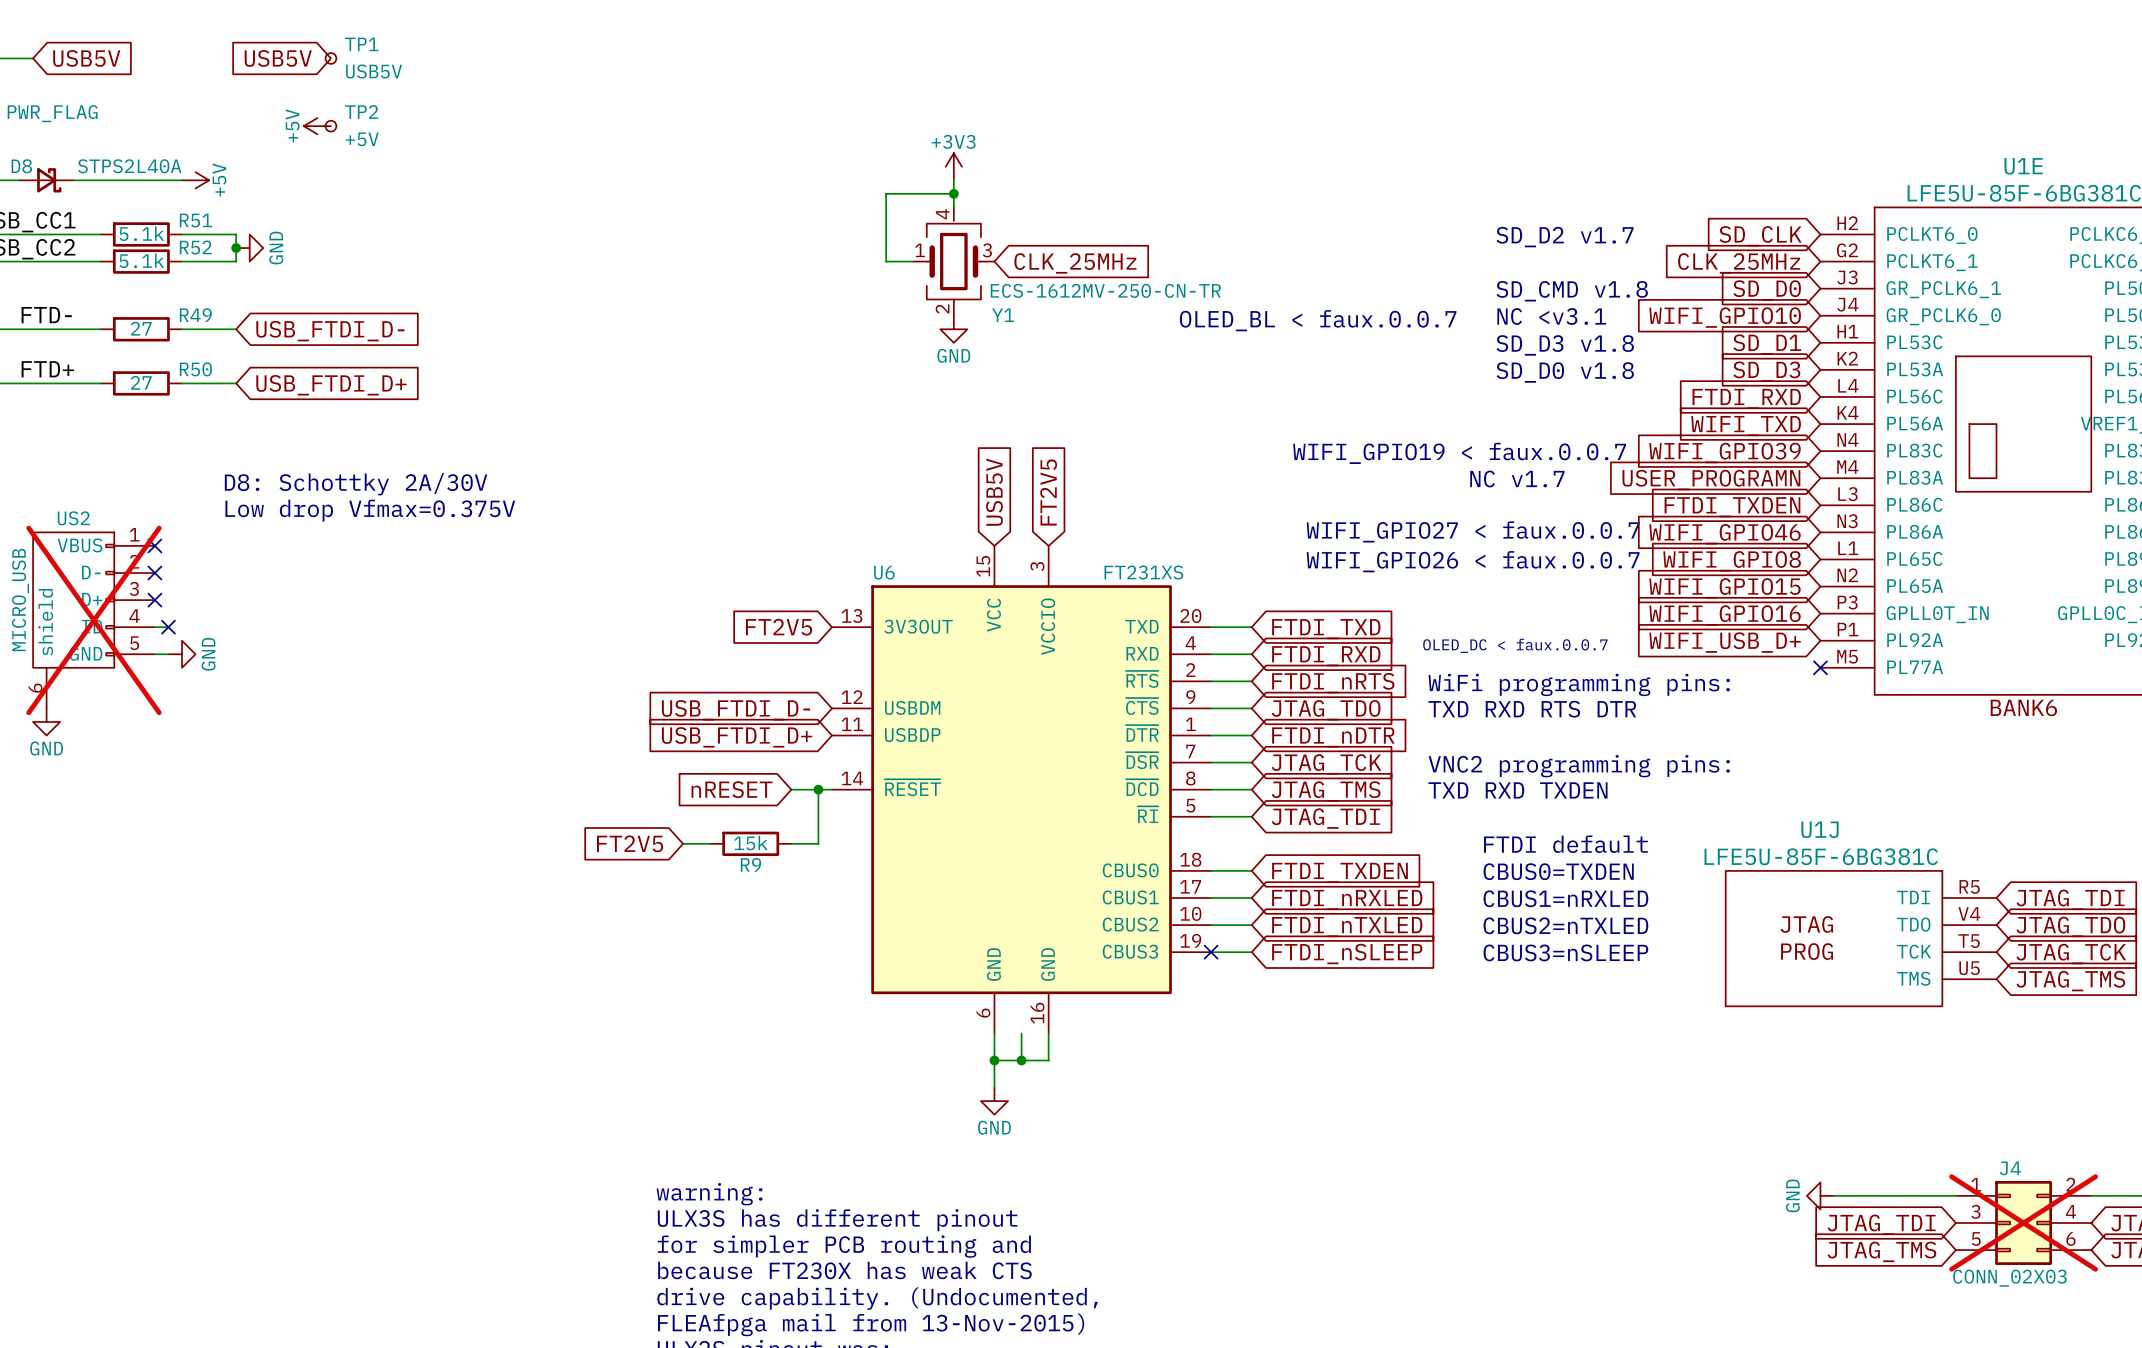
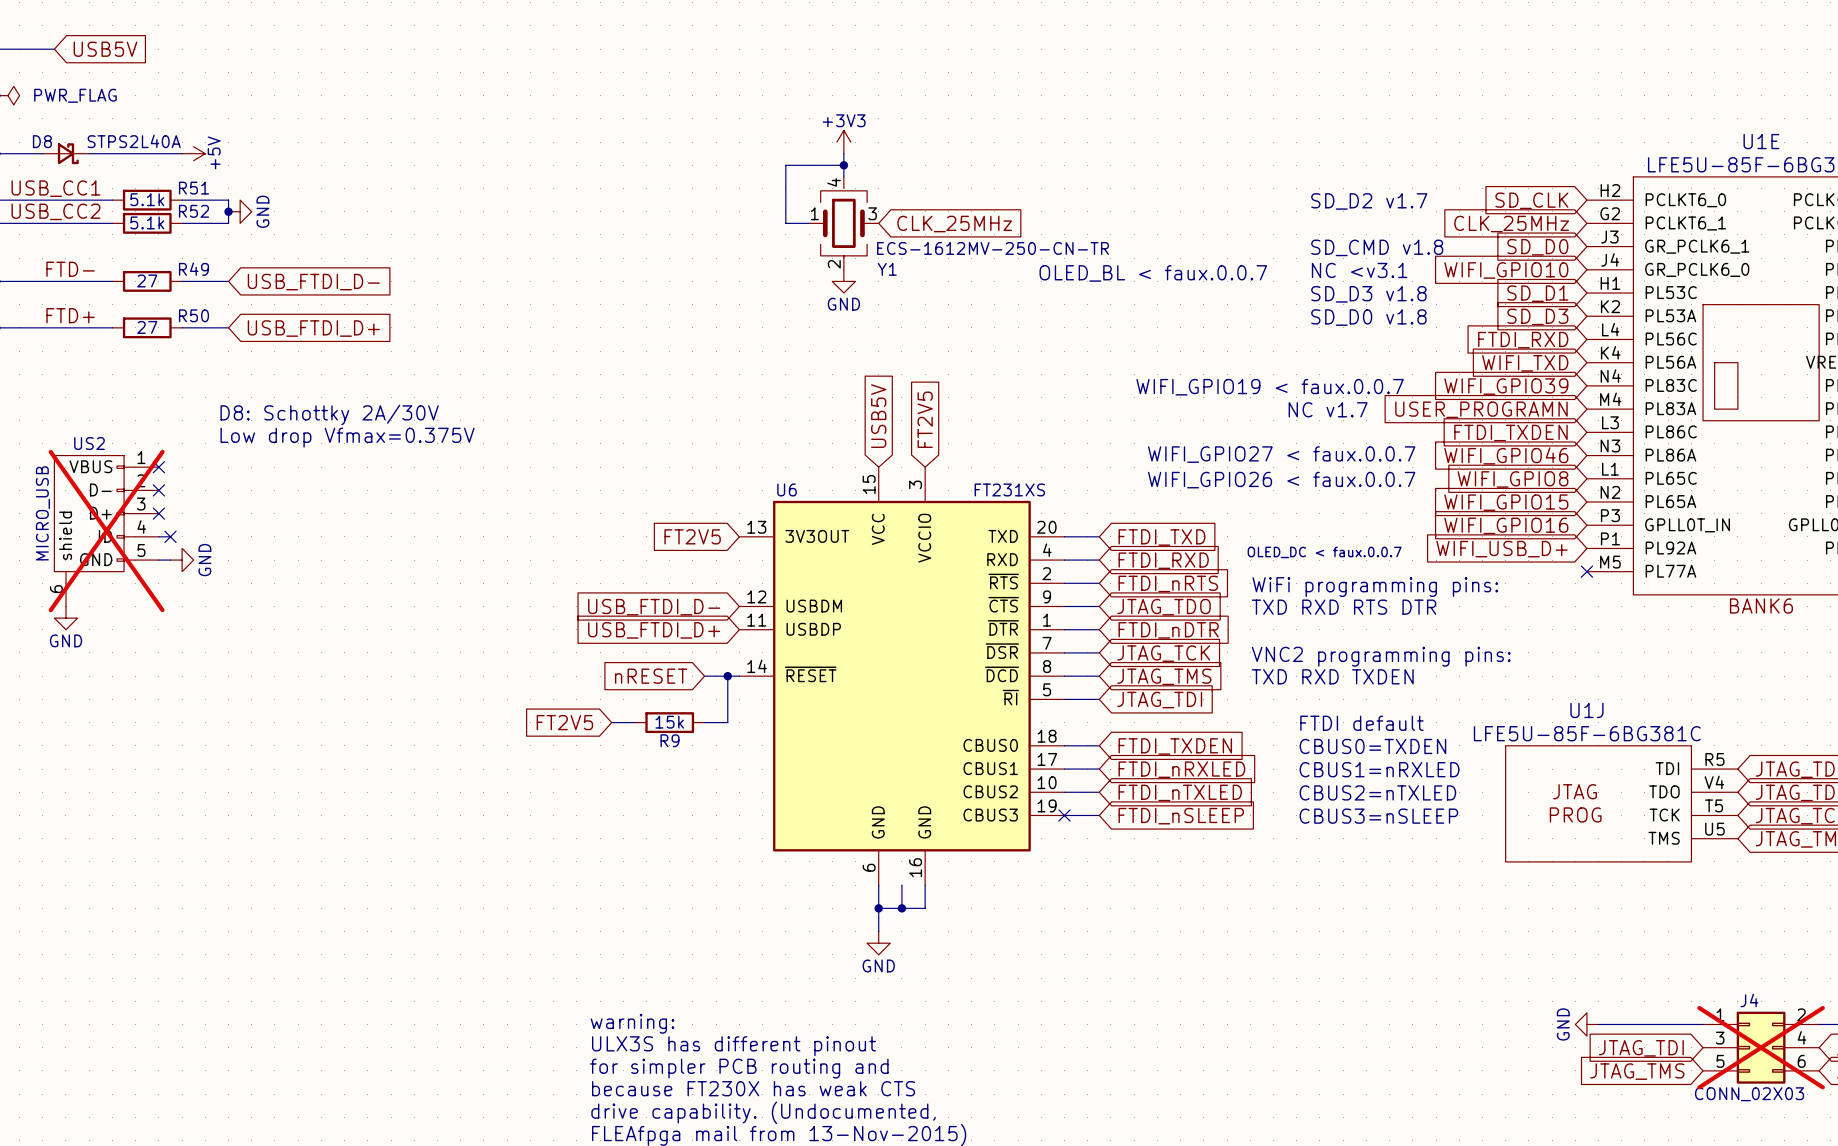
global label: USB5V (278, 58) -> none
TP1: USB5V (330, 58) -> none
power symbol: +5V (317, 126) -> none
TP2: +5V (330, 126) -> none

